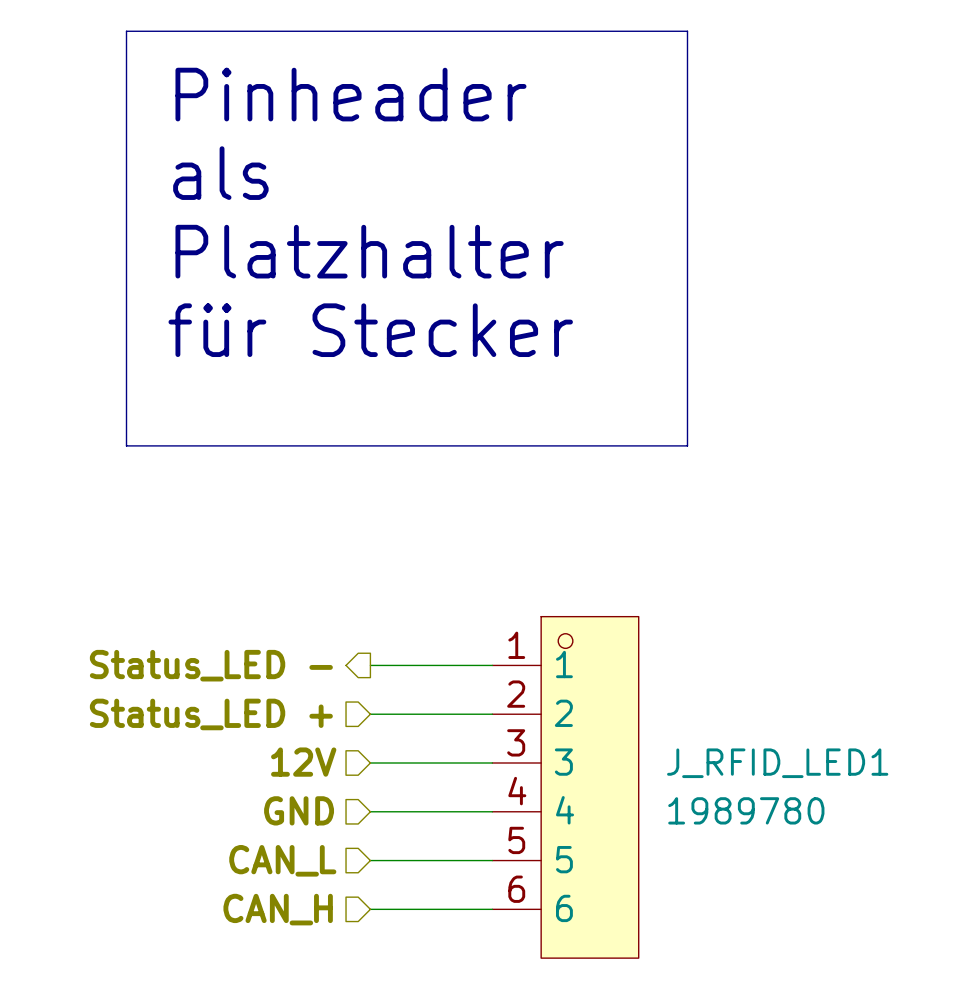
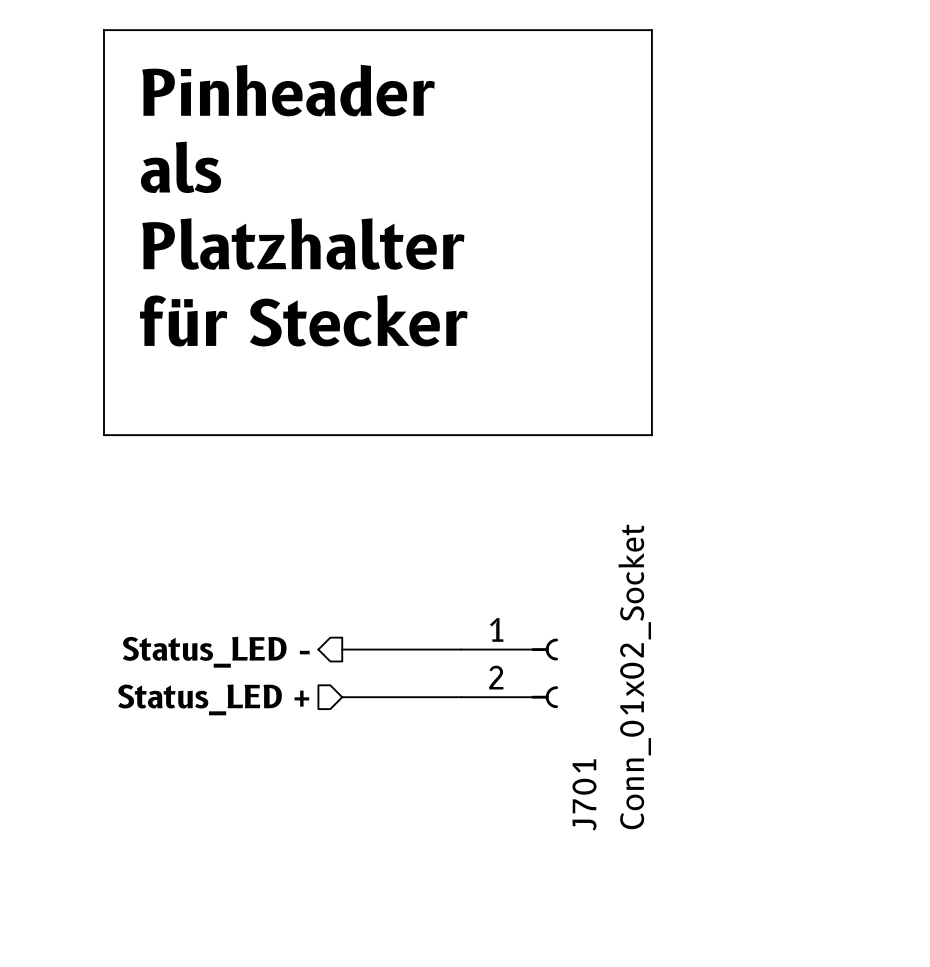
J701: none -> Conn_01x02_Socket (509, 673)
hierarchical label: 12V (303, 762) -> none
wire: (370, 763) (492, 763) -> none
J_RFID_LED1: 1989780 (565, 787) -> none
hierarchical label: GND (299, 810) -> none
wire: (370, 811) (492, 811) -> none
hierarchical label: CAN_L (282, 860) -> none
wire: (370, 860) (492, 860) -> none
hierarchical label: CAN_H (278, 909) -> none
wire: (370, 909) (492, 909) -> none

